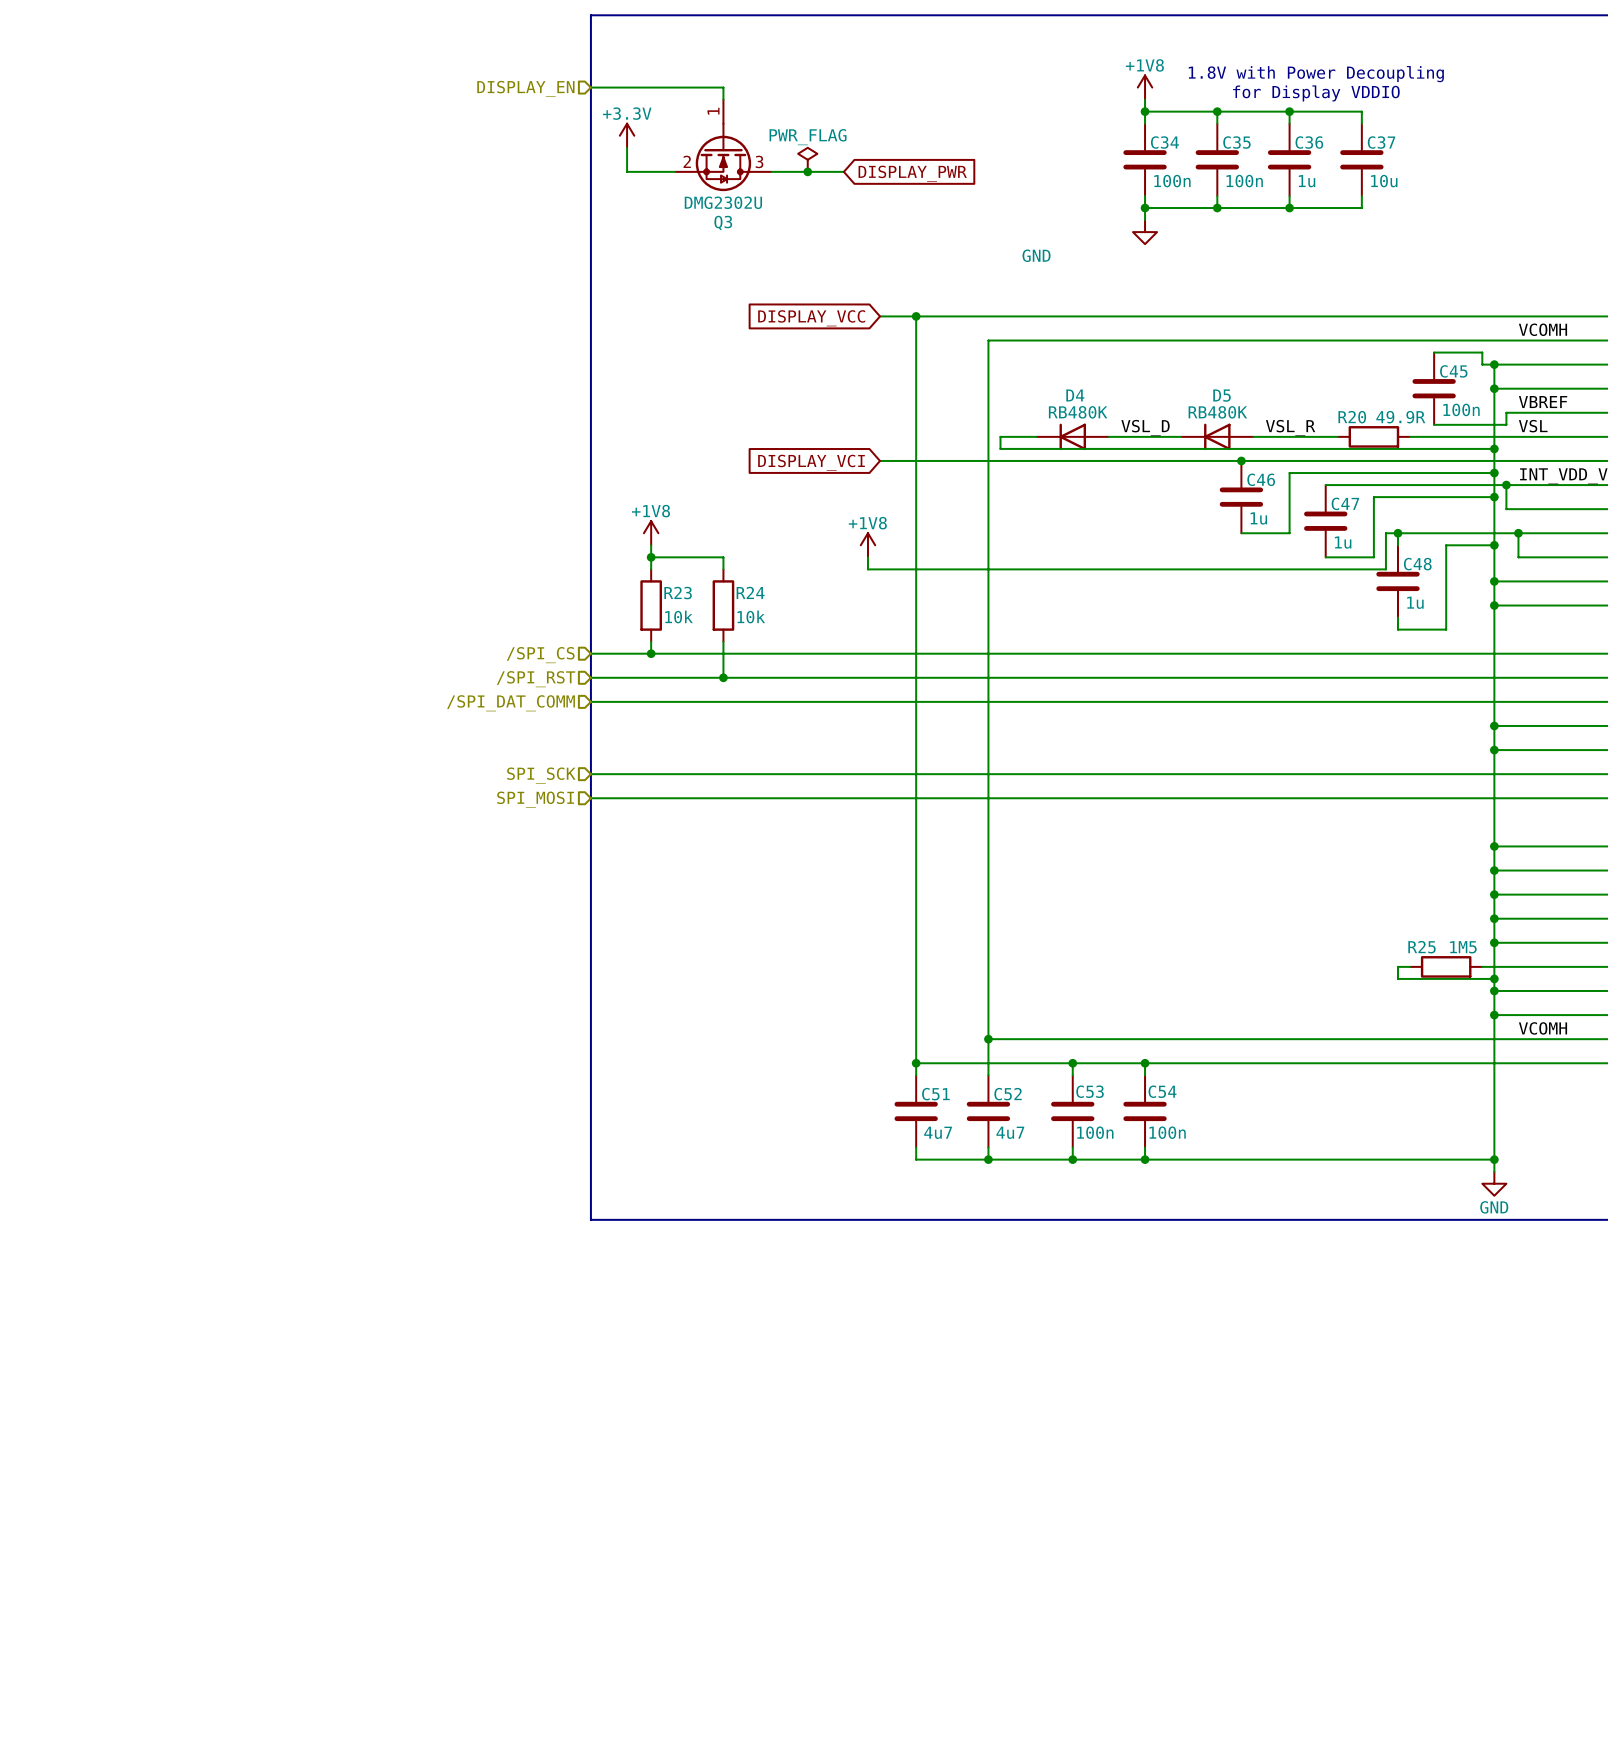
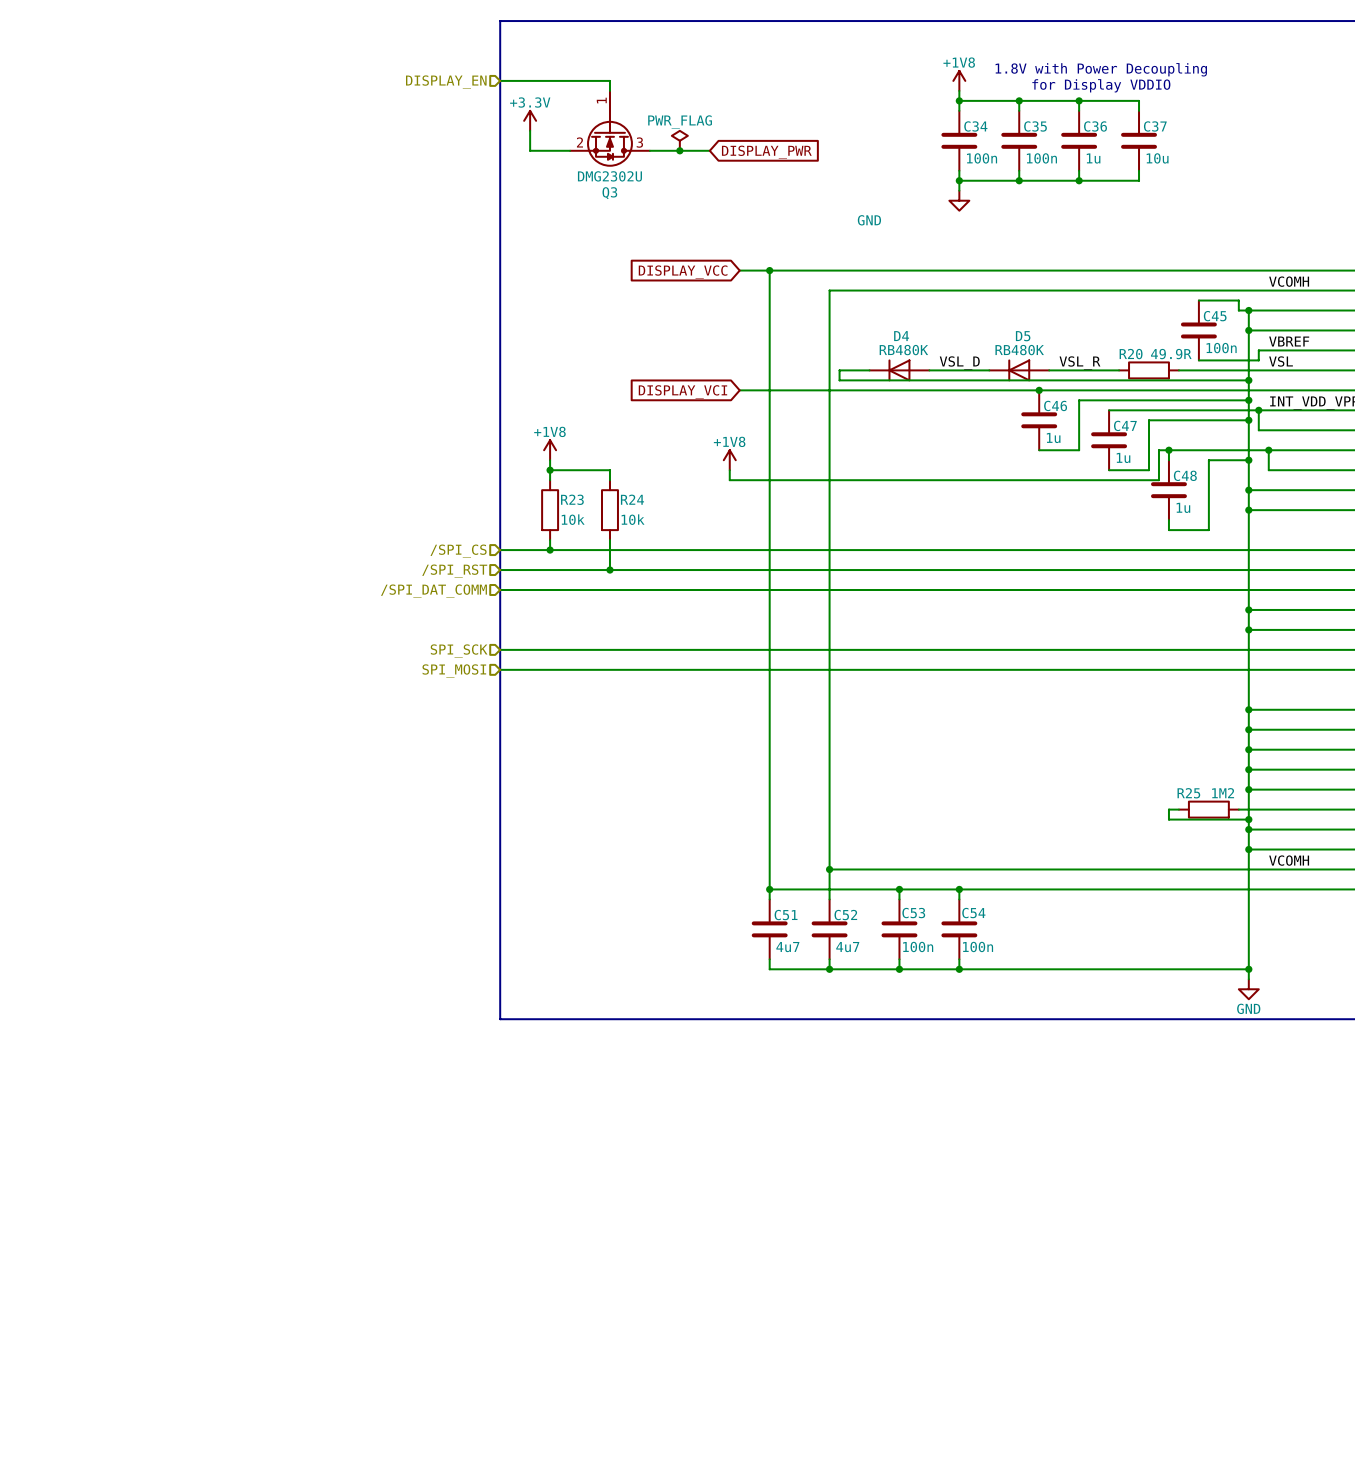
R25 value: 1M5 (1463, 947) -> 1M2 (1223, 793)

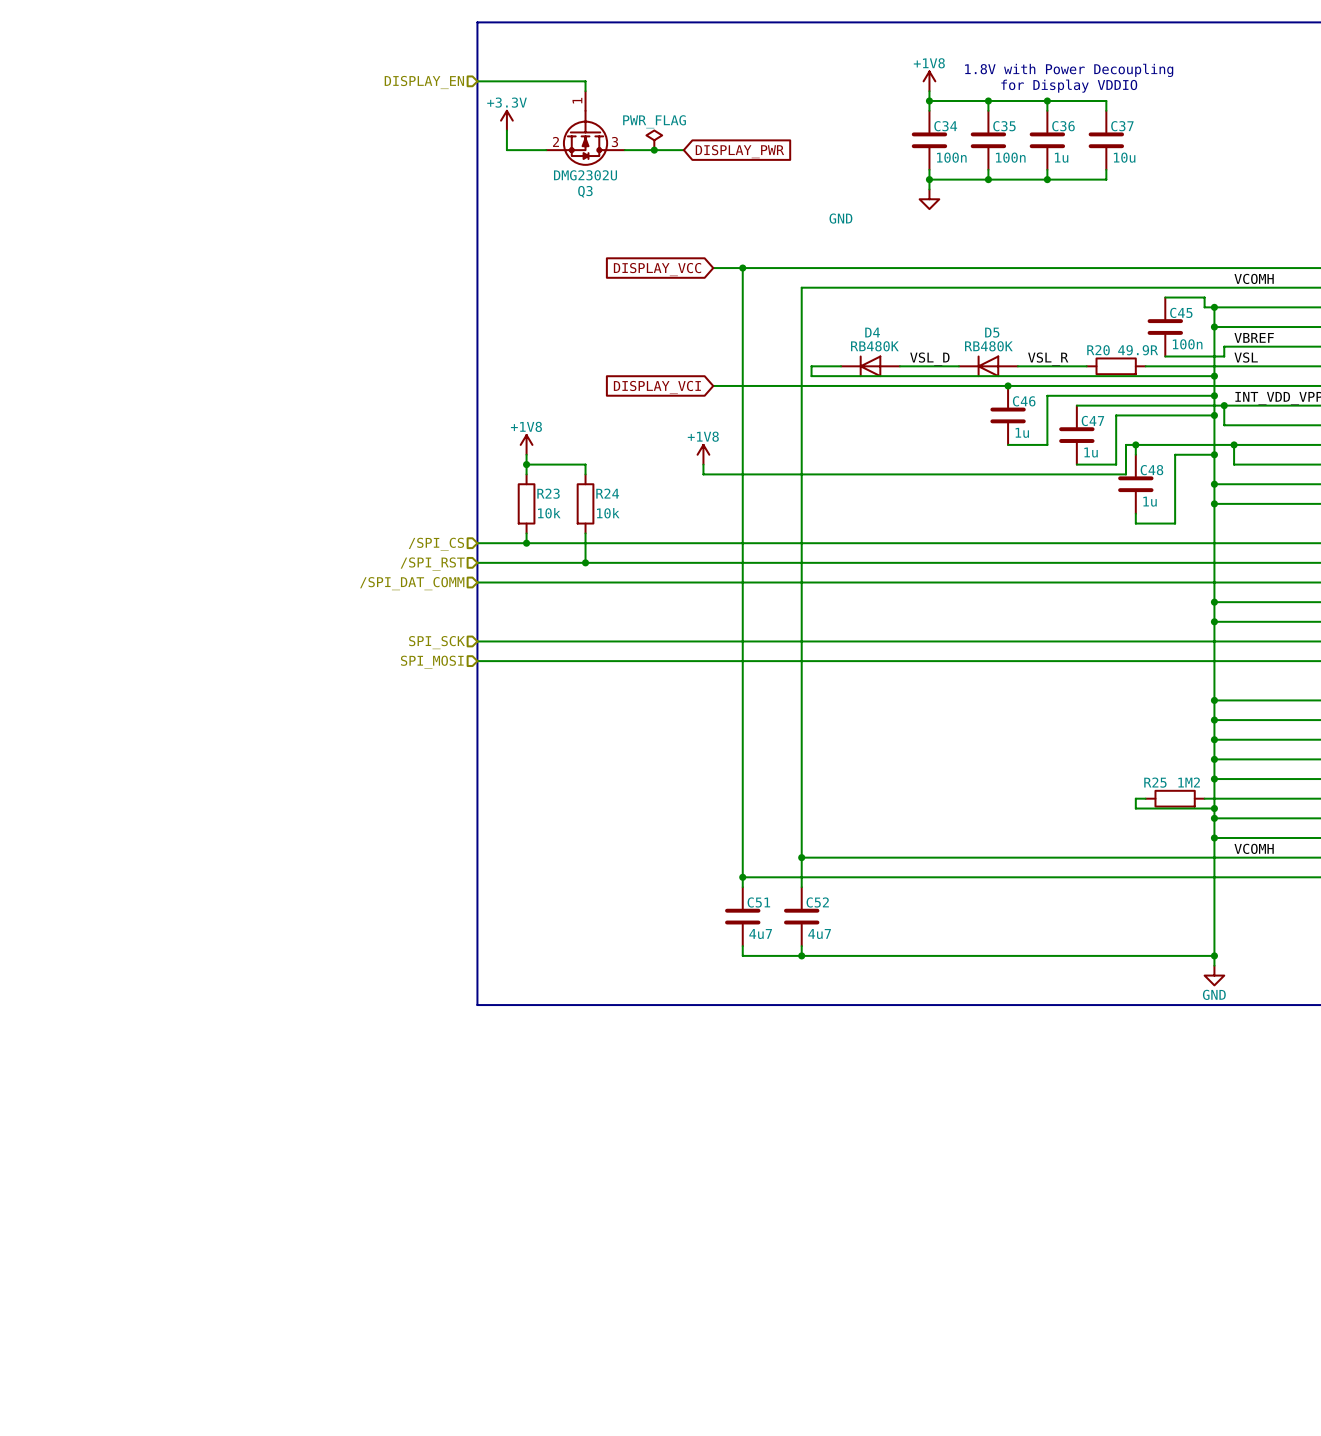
wire: (899, 889) (899, 899) -> none
junction: (899, 889) -> none
wire: (959, 889) (959, 899) -> none
junction: (959, 889) -> none
C53: 100n (899, 929) -> none
C54: 100n (959, 929) -> none
wire: (899, 959) (899, 969) -> none
wire: (959, 959) (959, 969) -> none
junction: (899, 969) -> none
junction: (959, 969) -> none

